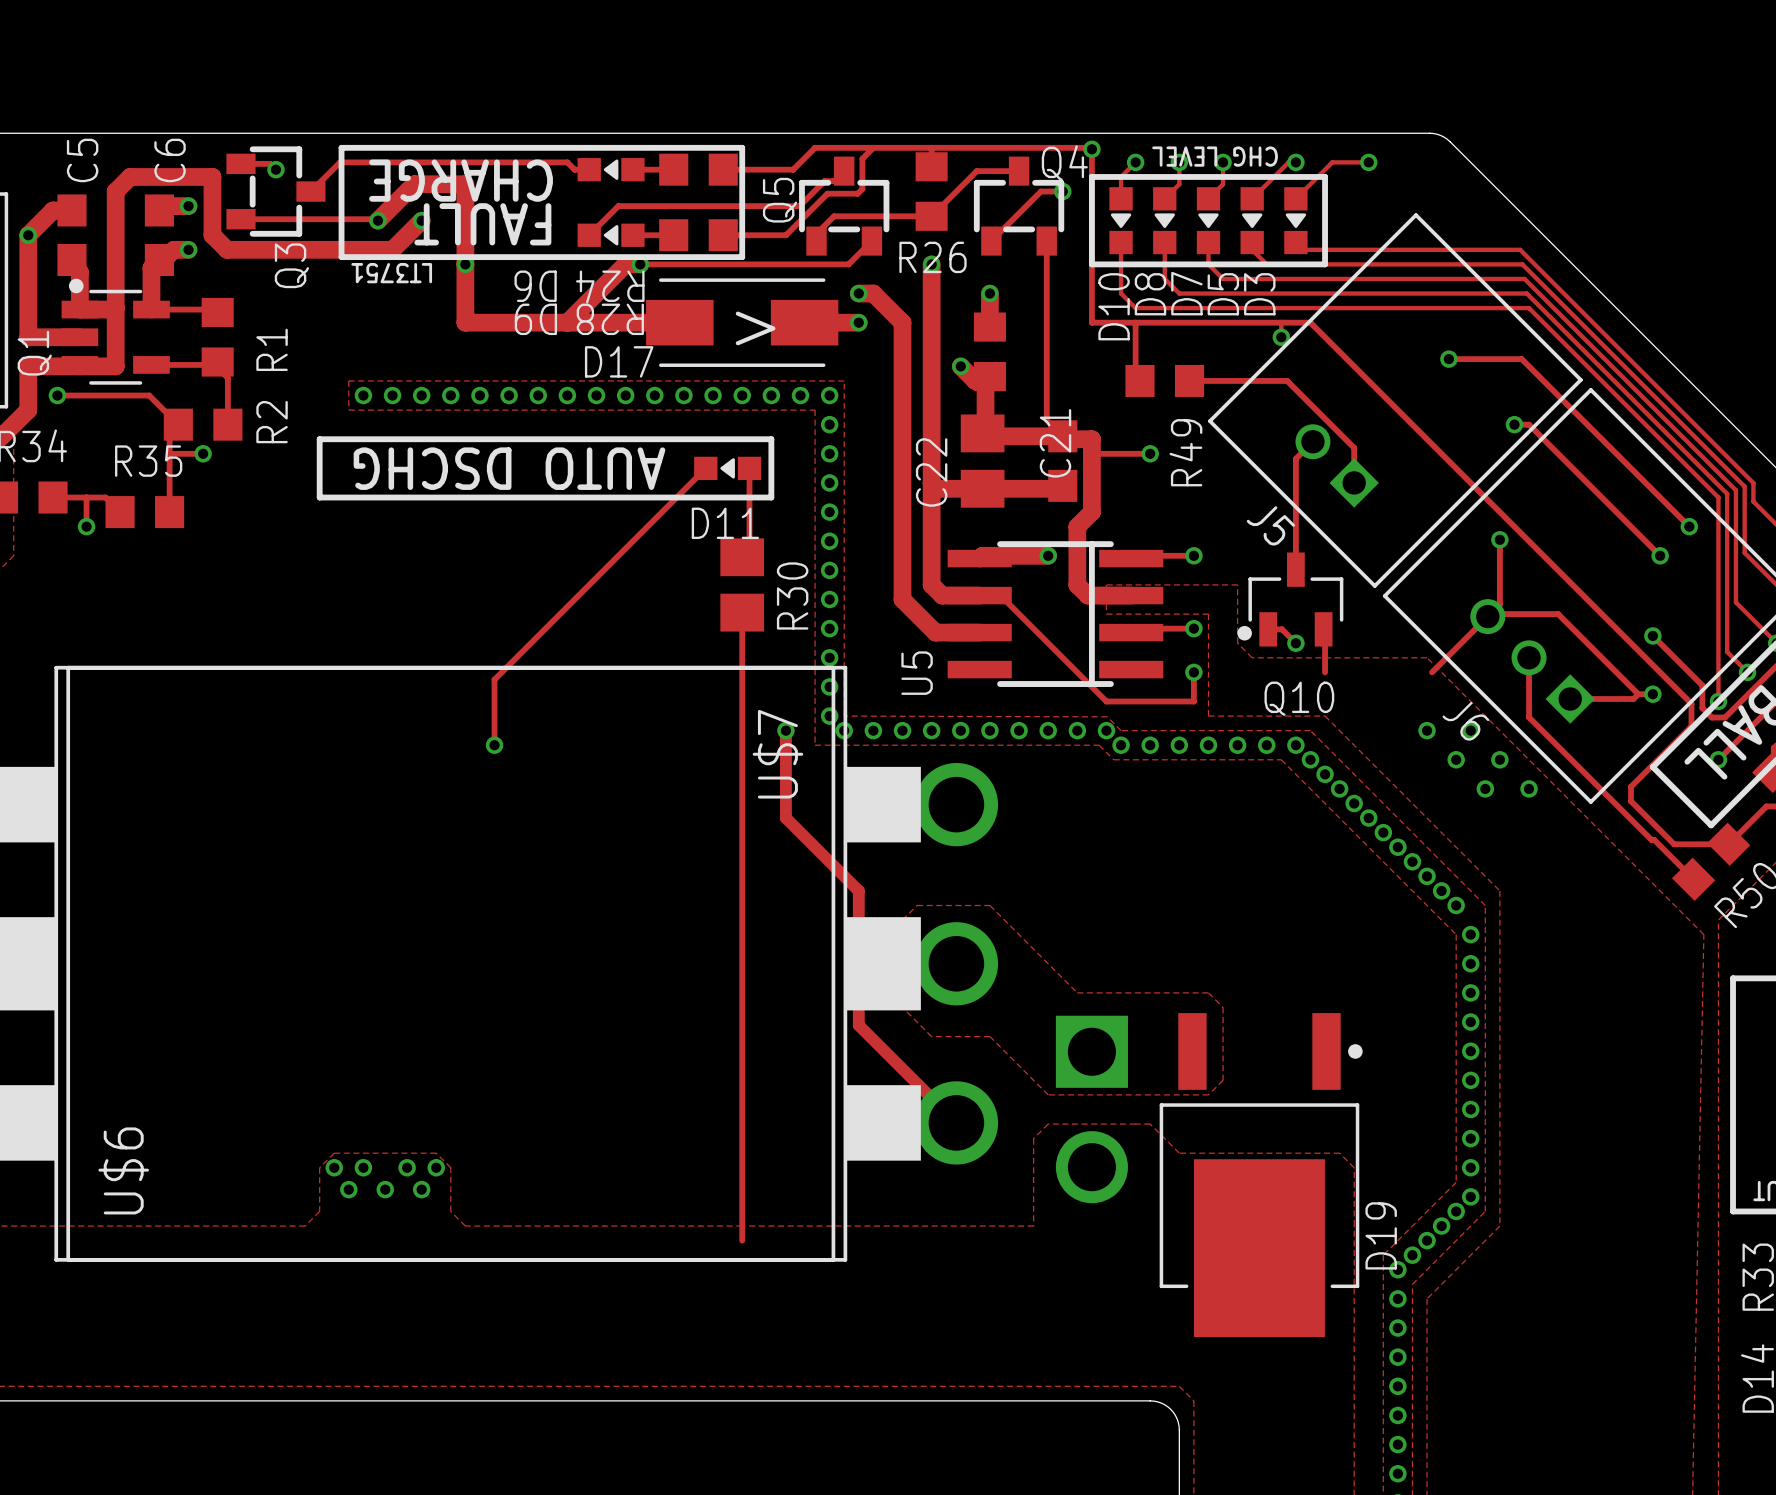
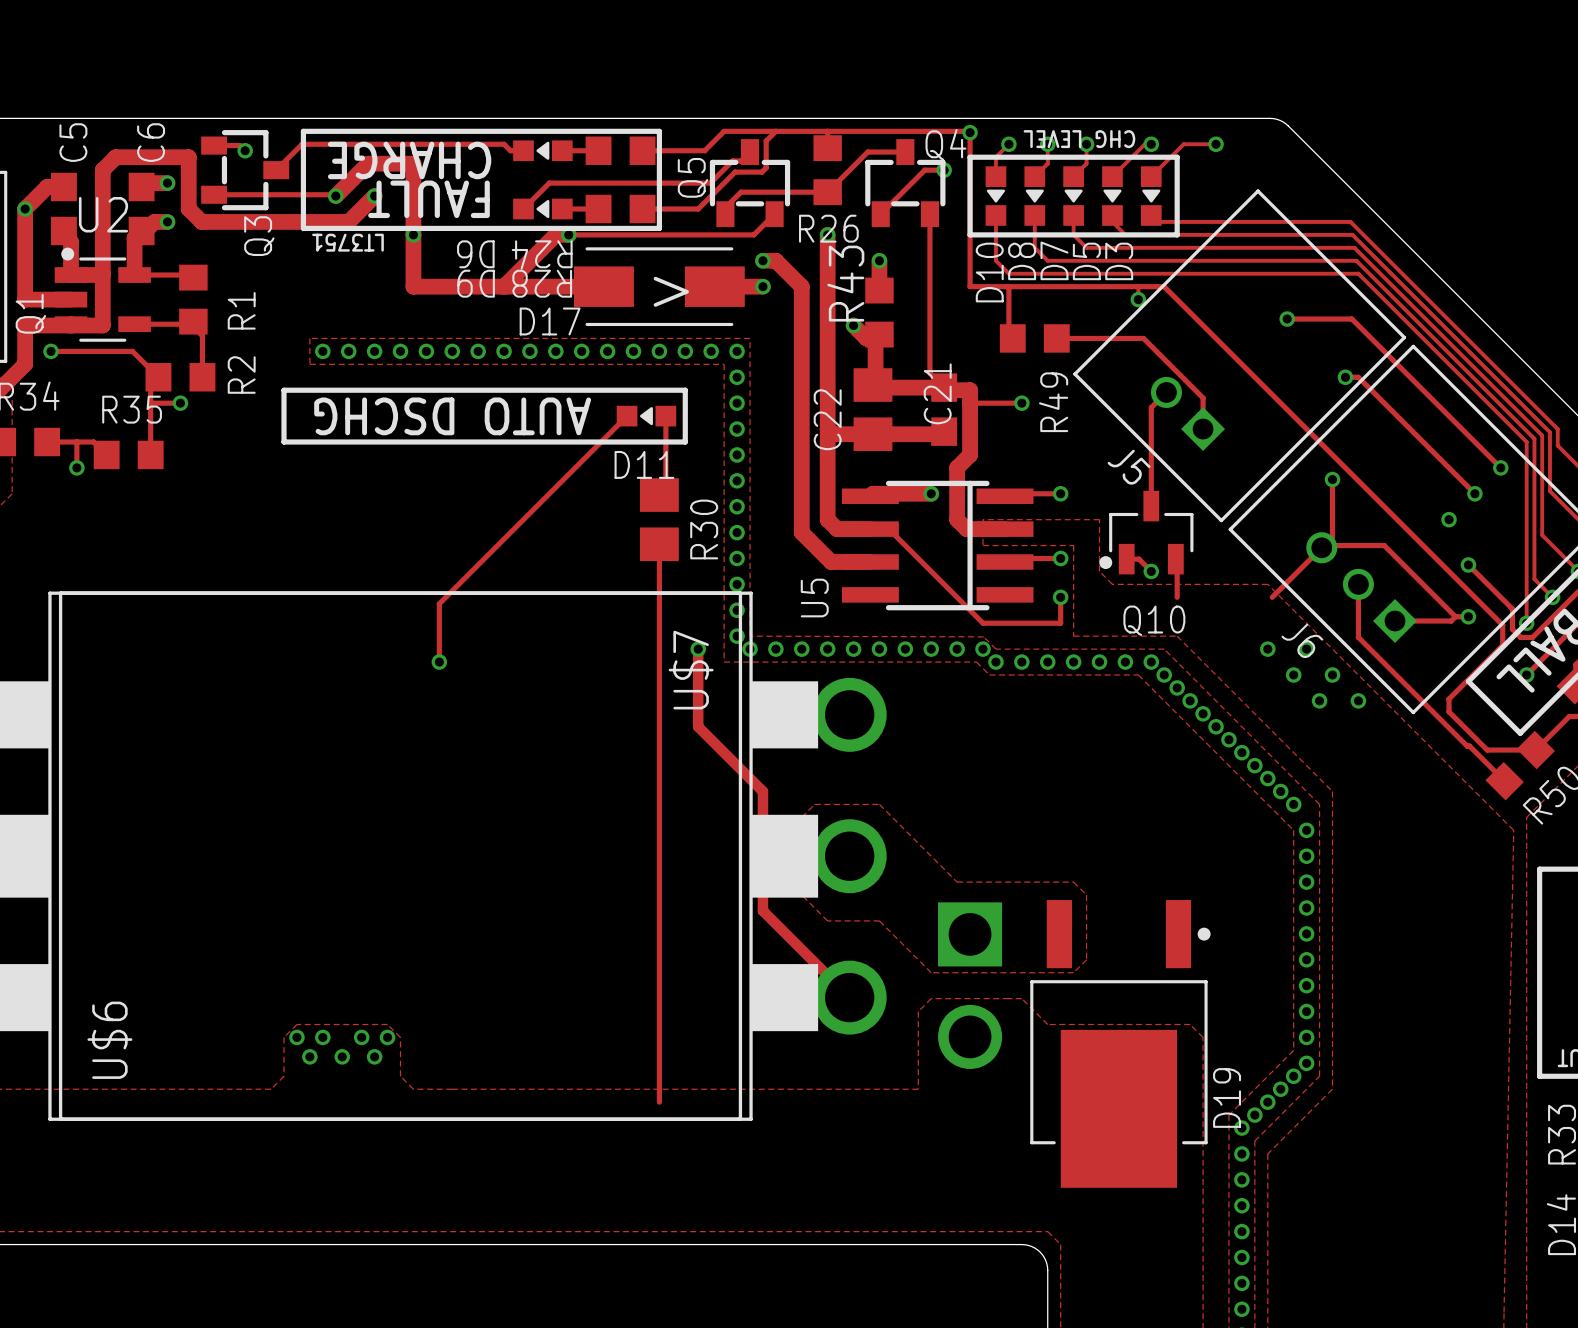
U2 name: none -> U2 (103, 214)
R43 name: none -> R43 (845, 283)
via: none -> (1449, 519)

